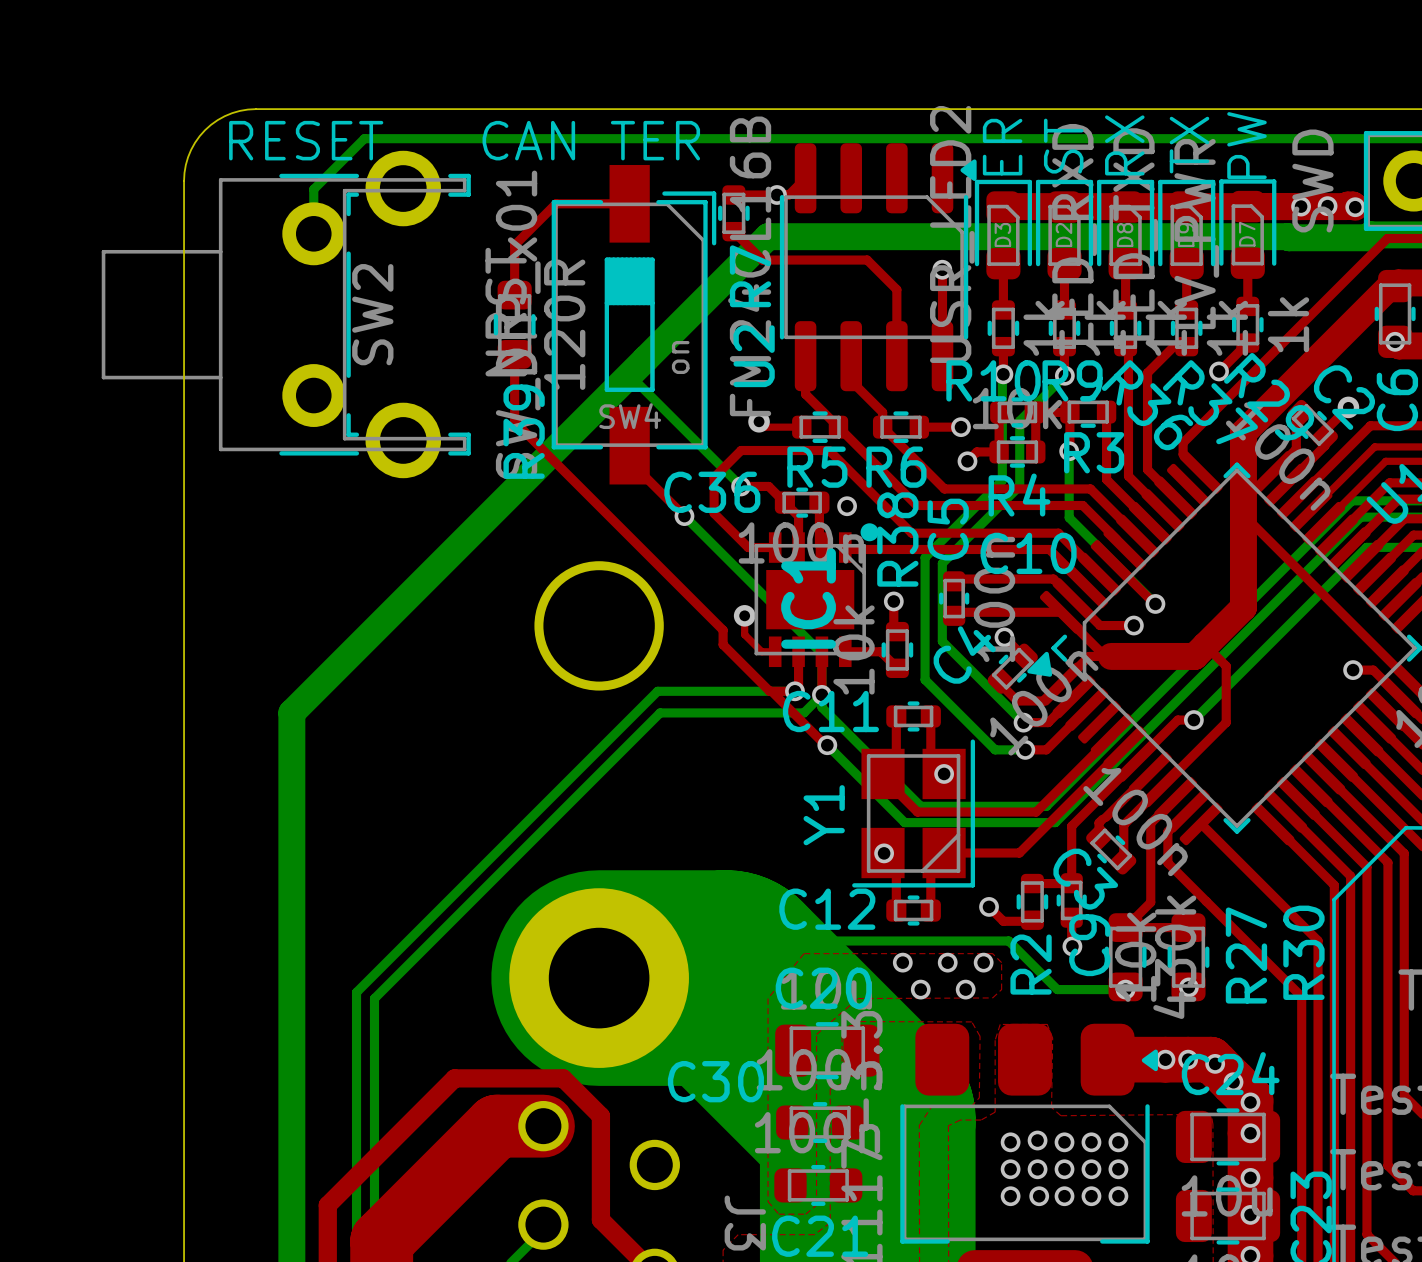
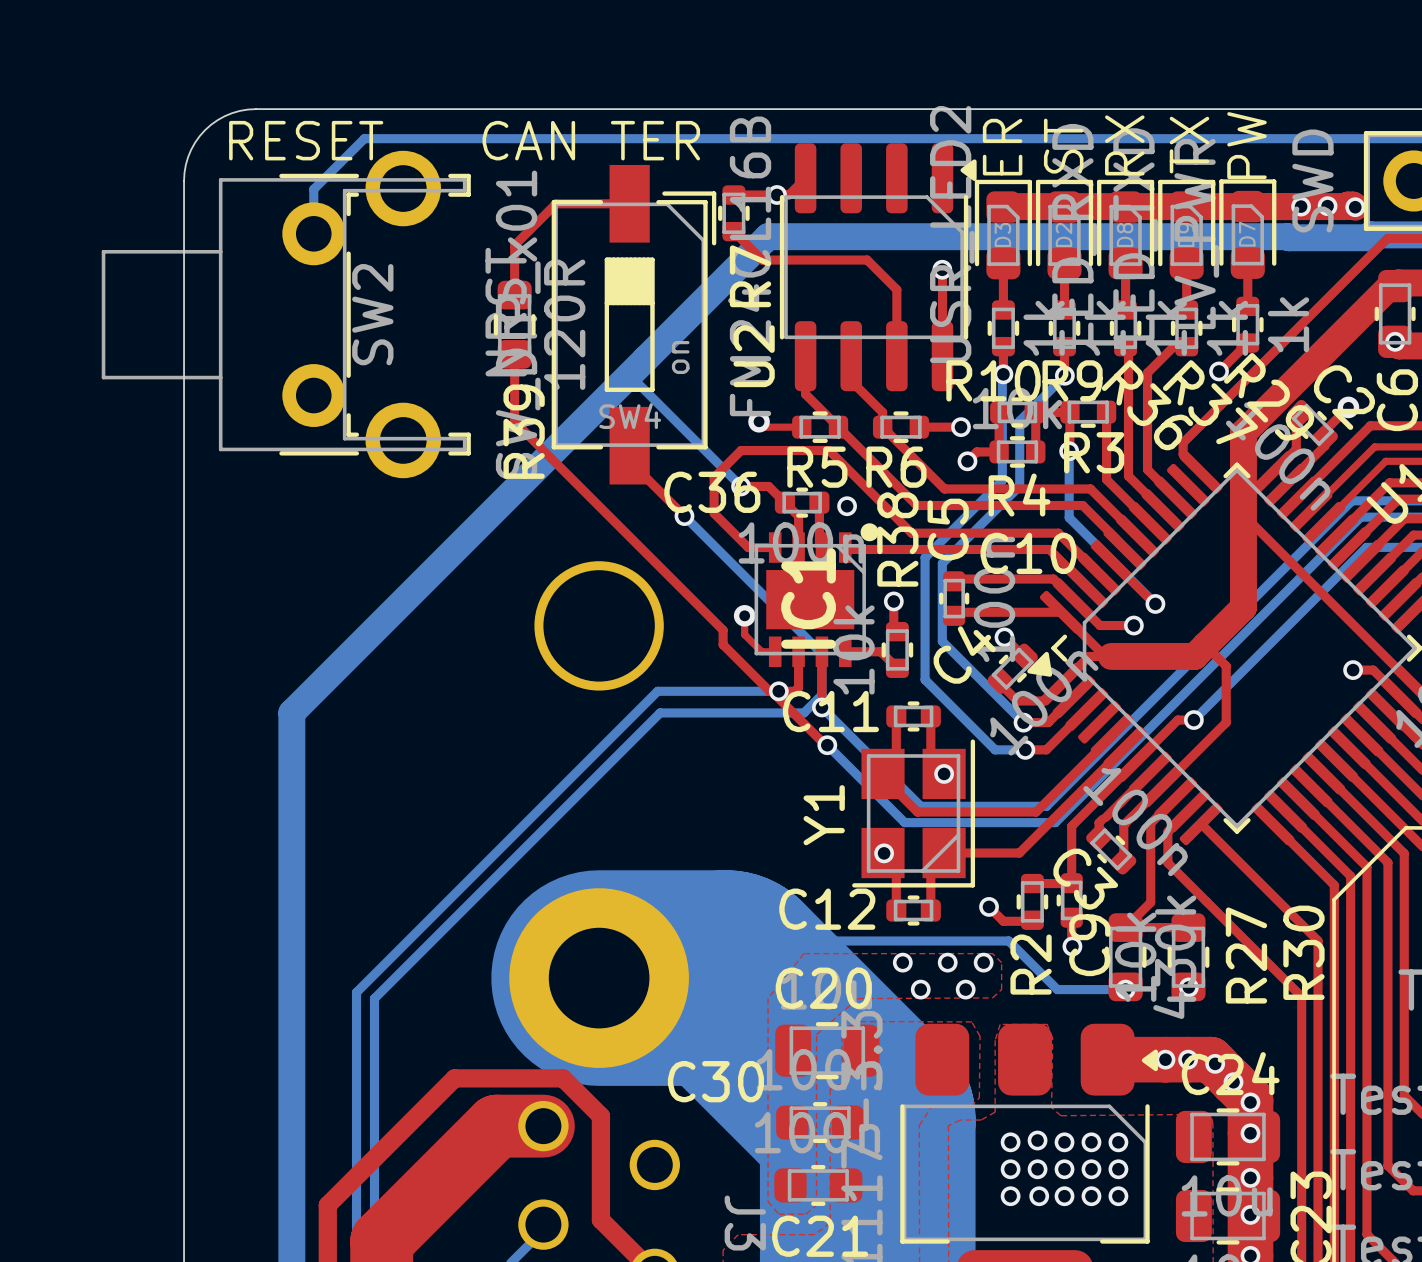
via position: (794, 691) -> (778, 691)
via position: (821, 694) -> (821, 707)

